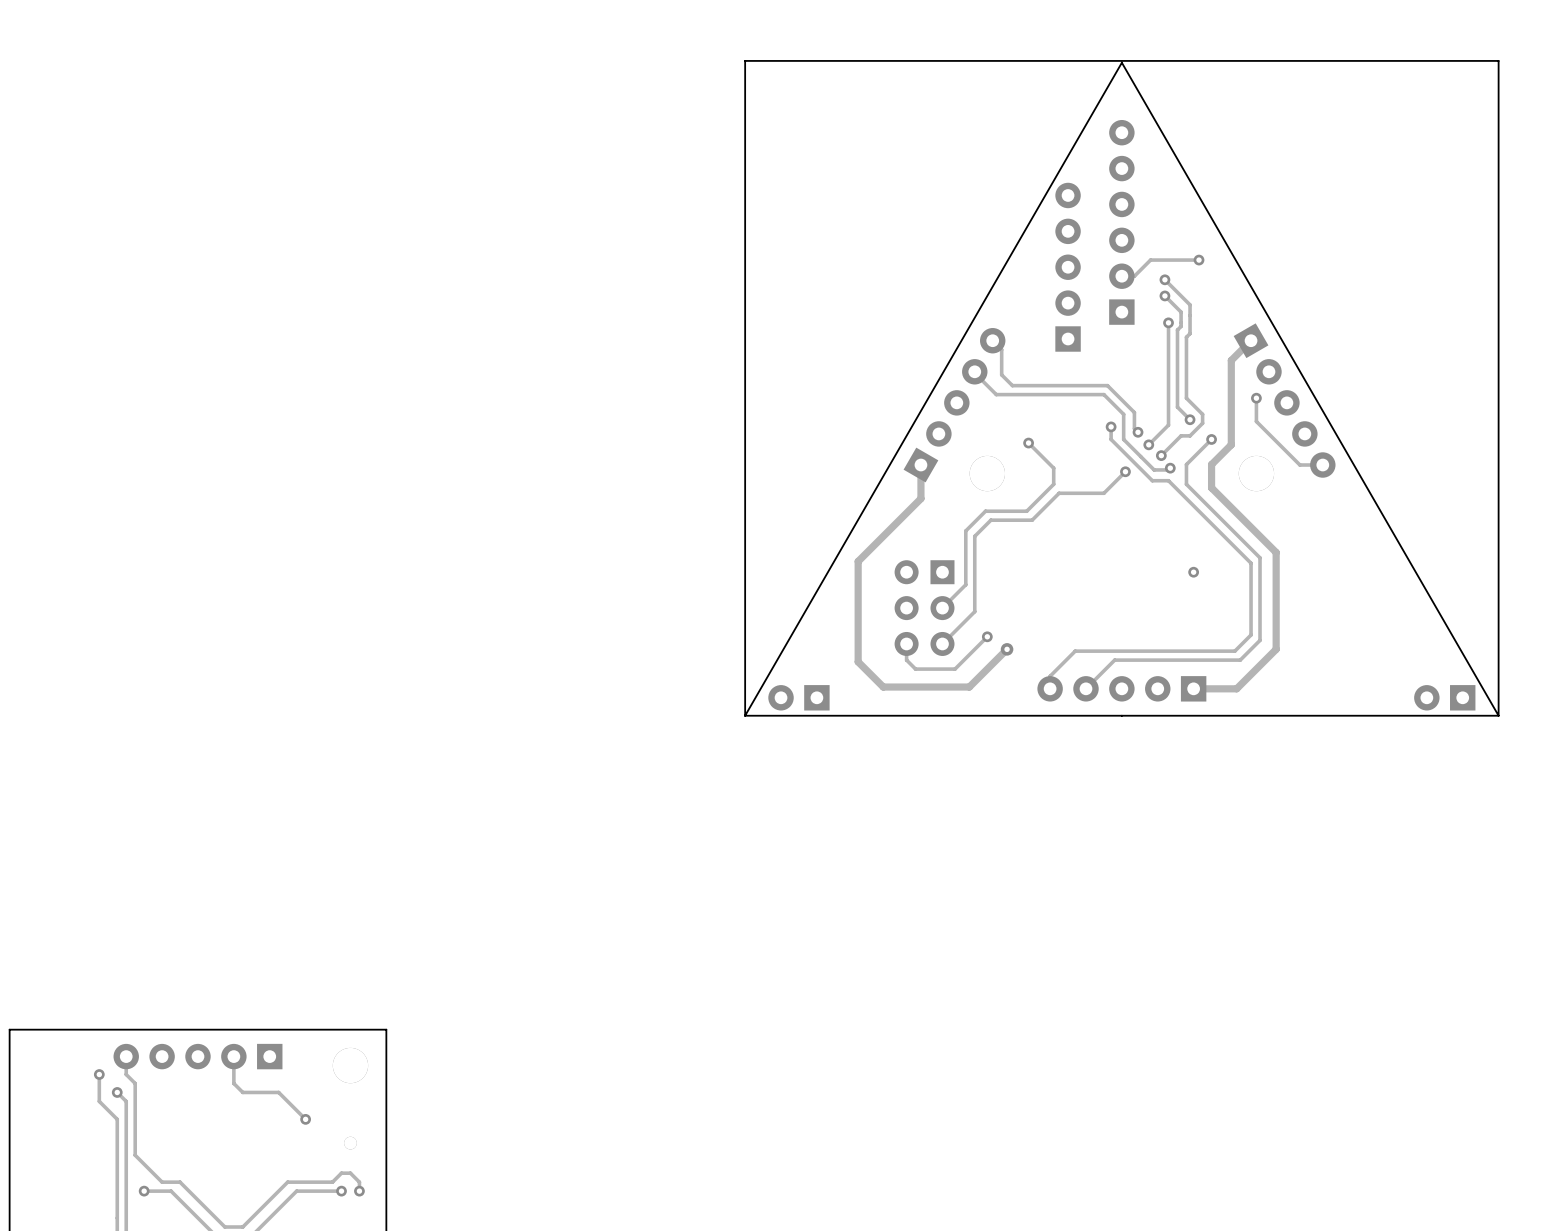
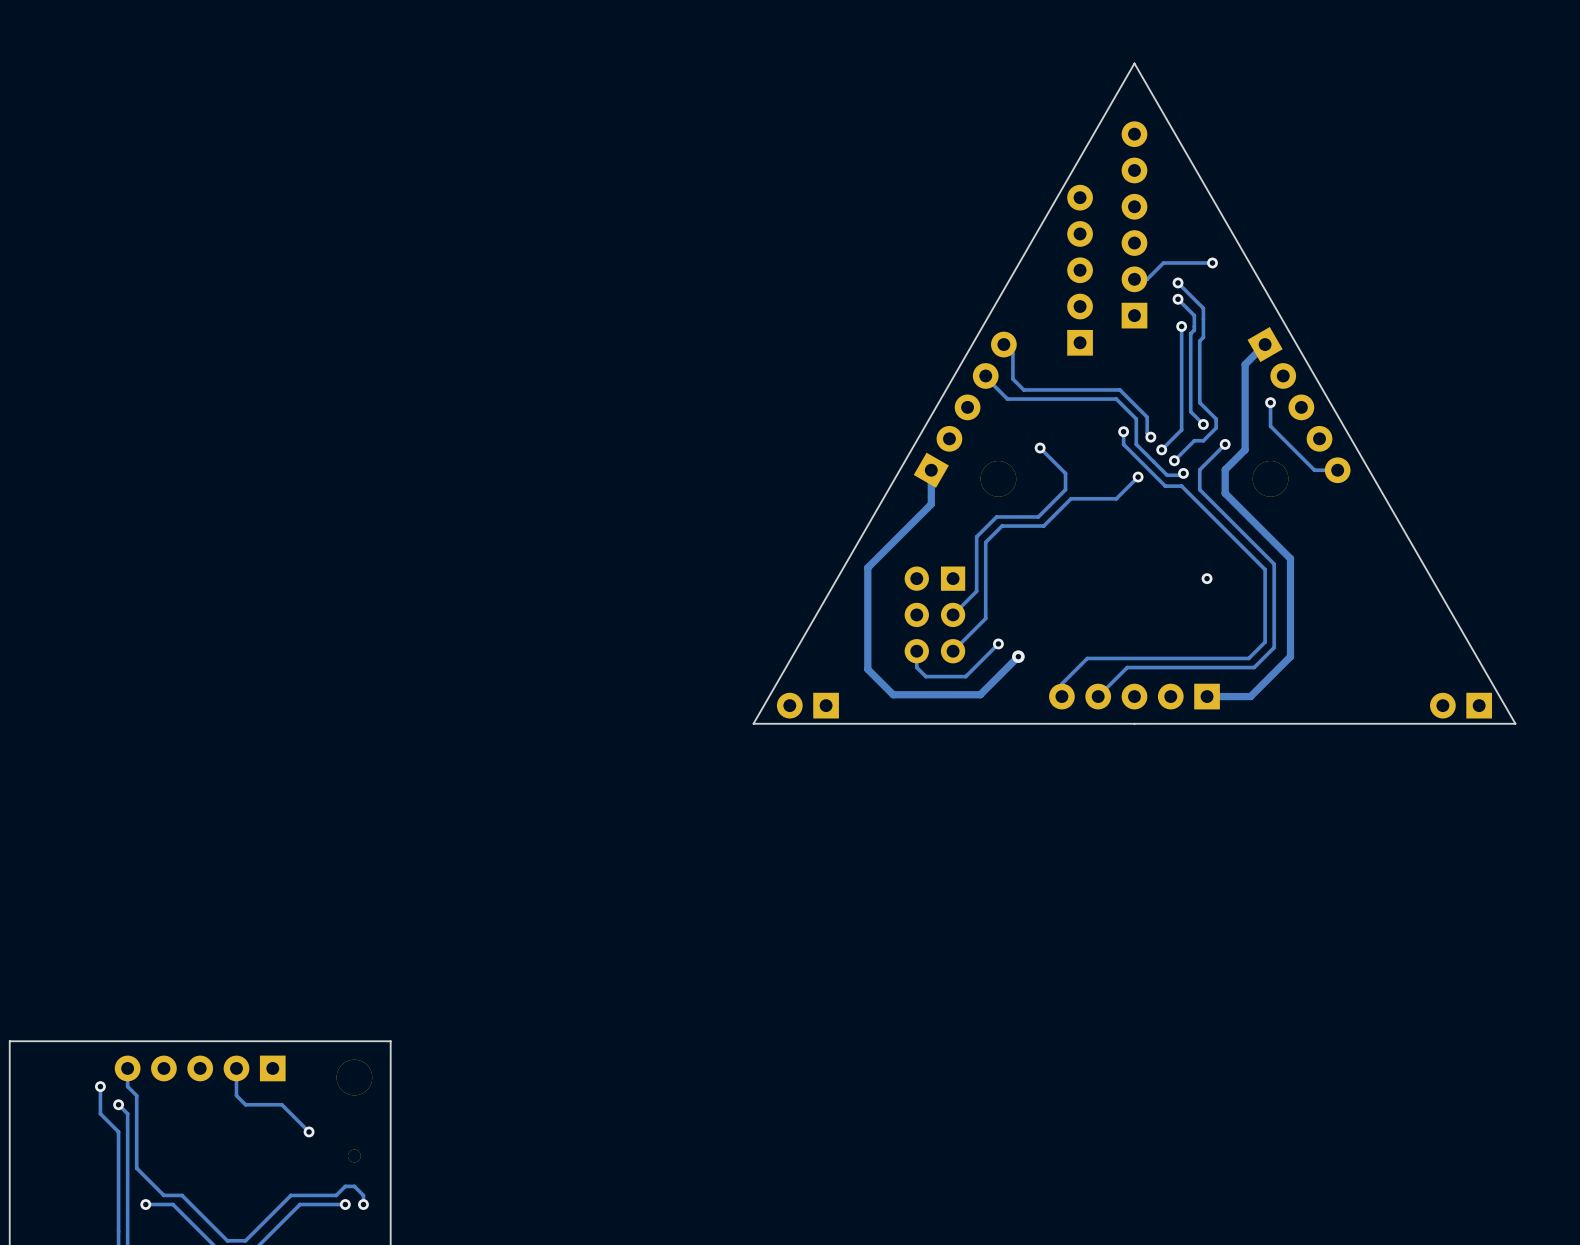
board edge: (1498, 715) (1498, 60) (745, 60) (745, 715) -> none

